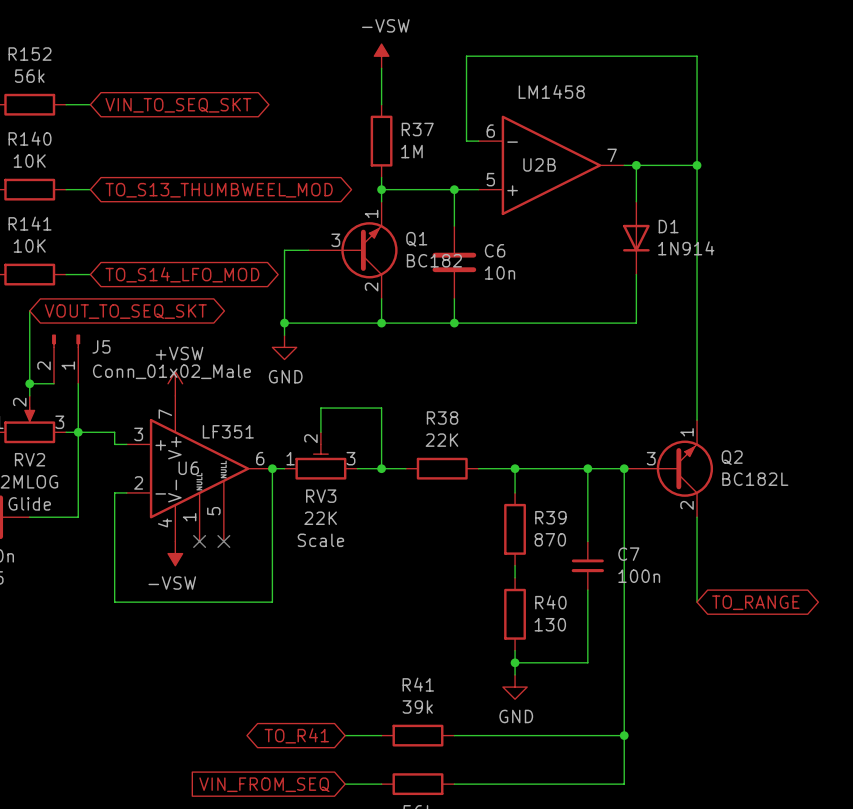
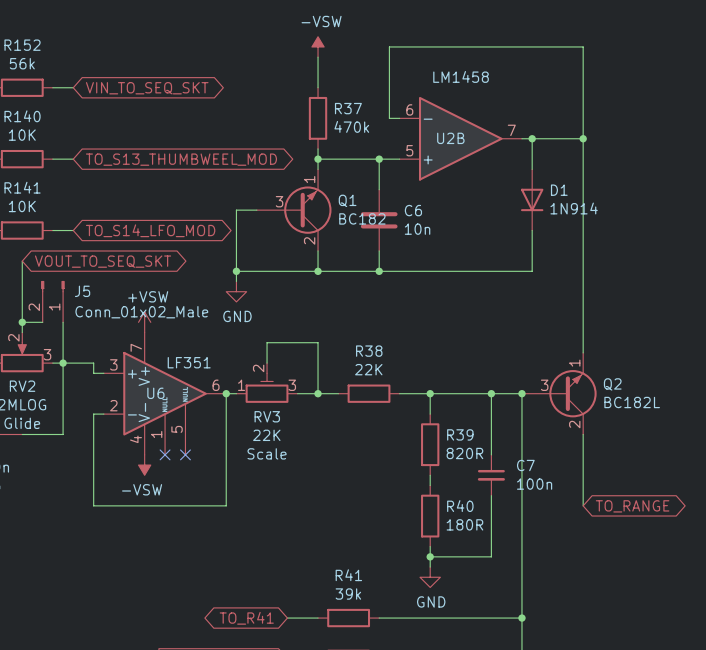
R37 value: 1M (411, 151) -> 470k (351, 126)
R39 value: 870 (550, 539) -> 820R (464, 453)
R40 value: 130 (550, 624) -> 180R (464, 524)

